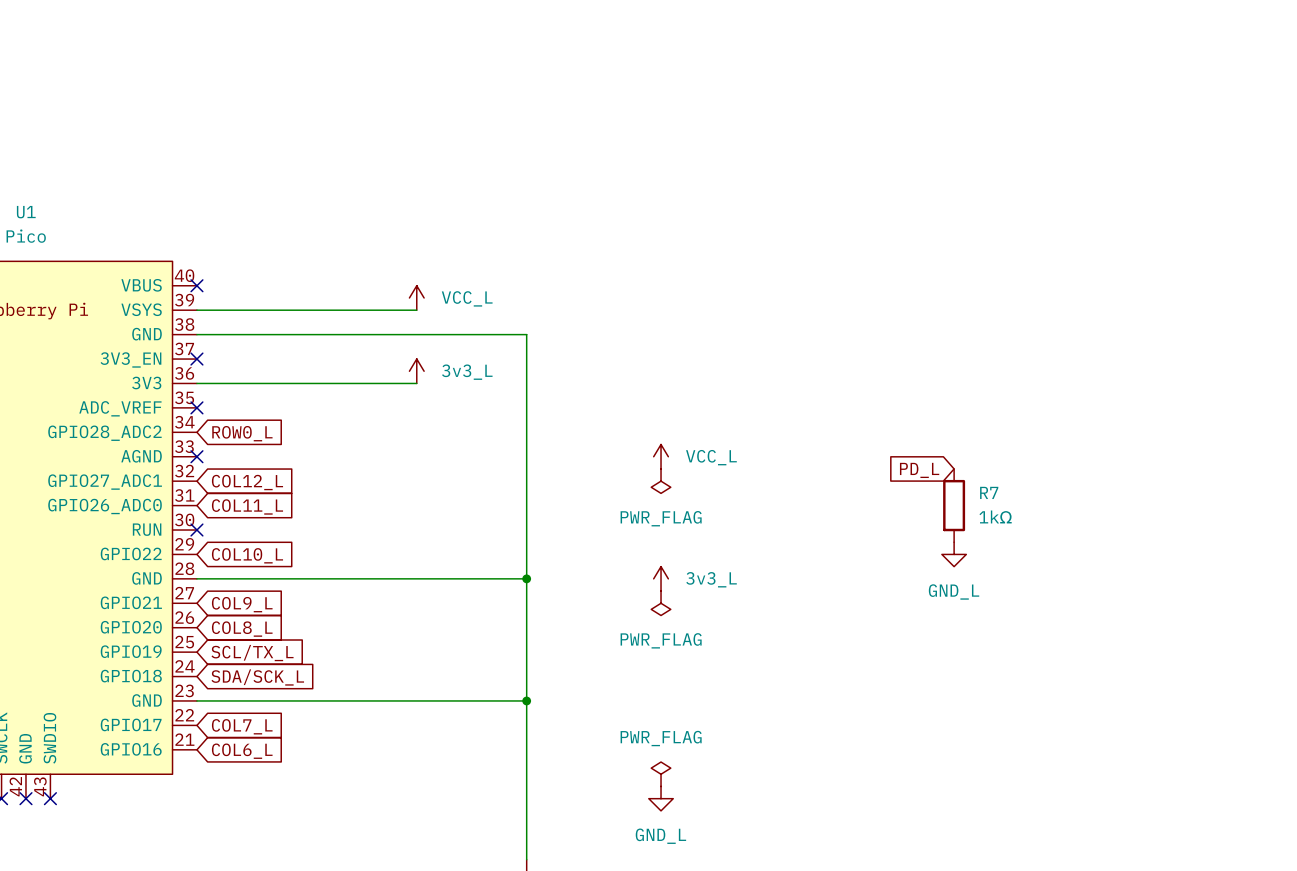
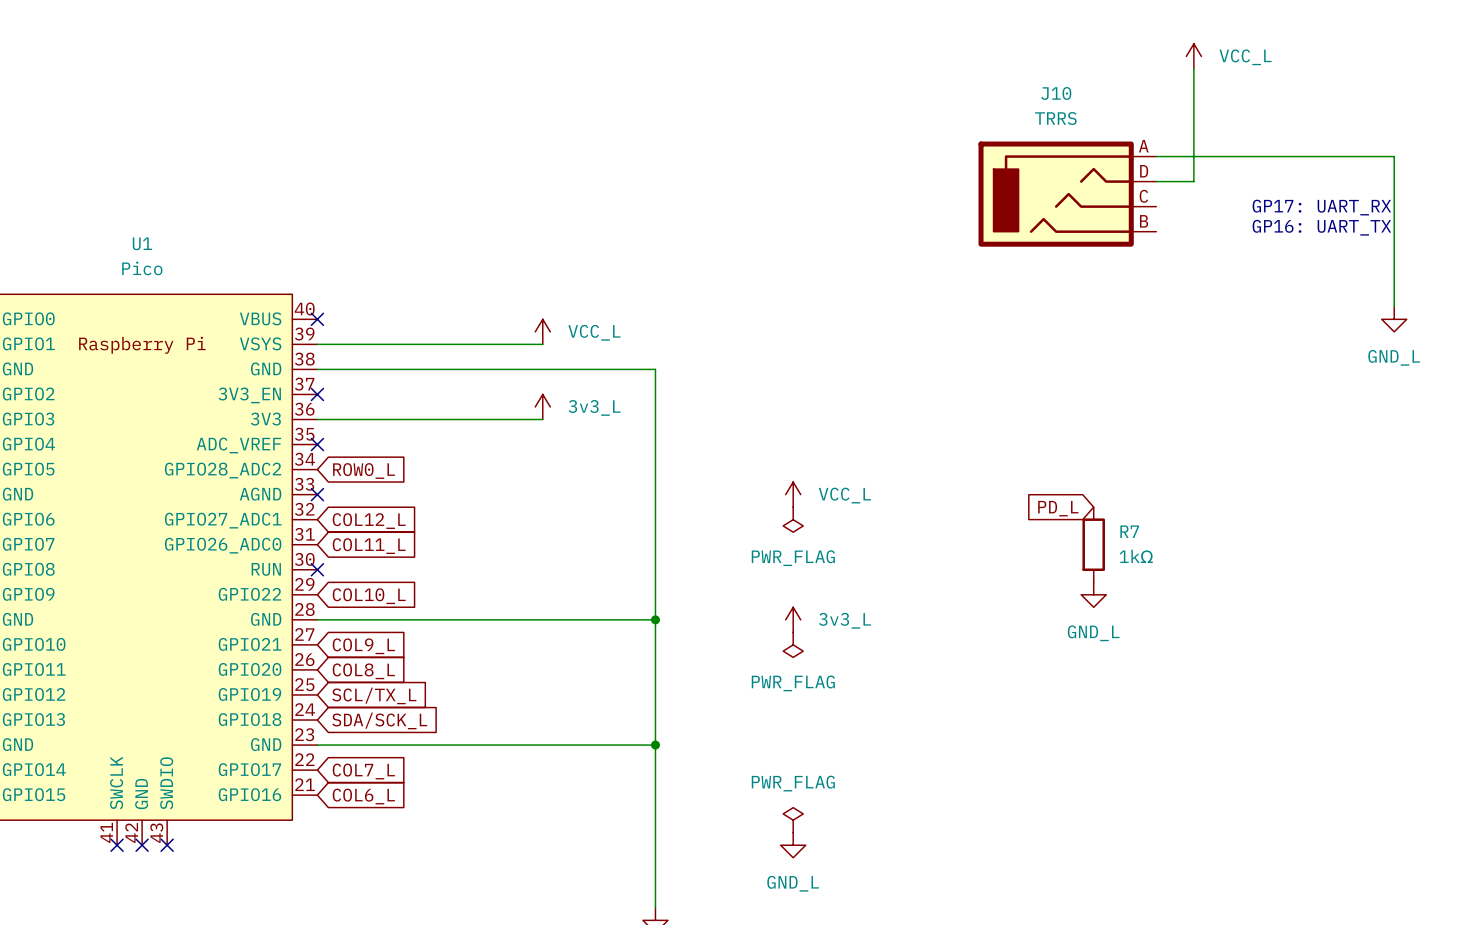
power symbol: none -> VCC_L (1193, 56)
wire: none -> (1193, 68) (1193, 181) (1156, 181)
wire: none -> (1156, 156) (1394, 156) (1394, 306)
J10: none -> TRRS (1067, 194)
text: none -> GP17: UART_RX (1321, 207)
text: none -> GP16: UART_TX (1321, 227)
power symbol: none -> GND_L (1394, 319)

